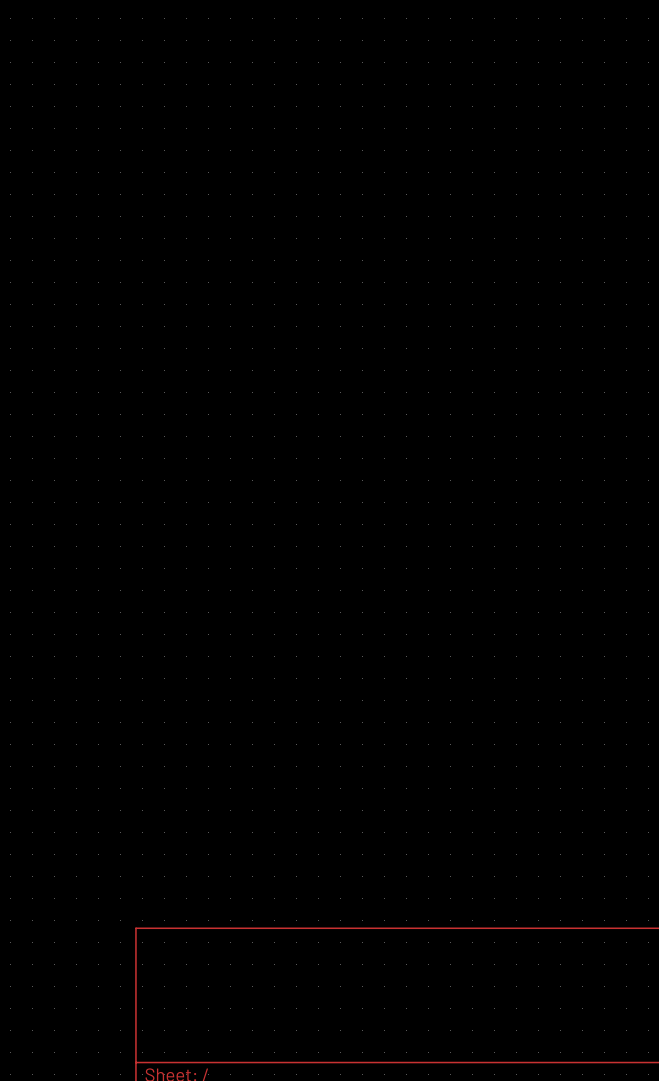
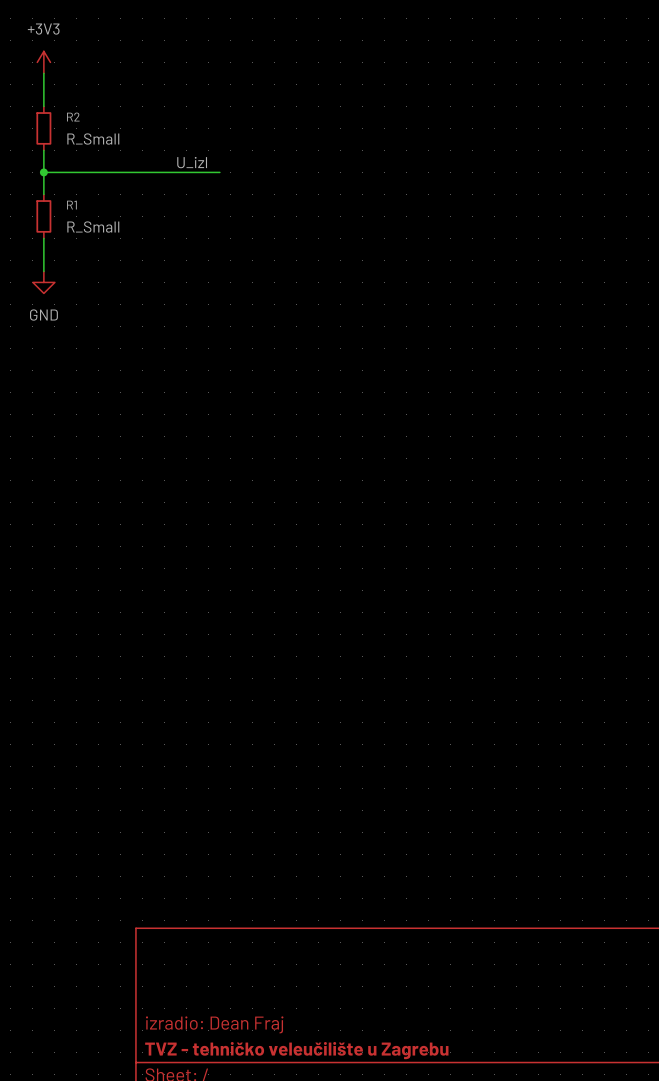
power symbol: none -> +3V3 (43, 62)
wire: none -> (43, 73) (43, 106)
R2: none -> R_Small (43, 128)
wire: none -> (43, 150) (43, 194)
label: none -> U_izl (192, 162)
wire: none -> (43, 172) (219, 172)
junction: none -> (43, 172)
R1: none -> R_Small (43, 216)
wire: none -> (43, 238) (43, 271)
power symbol: none -> GND (43, 282)
title block: none -> izradio: Dean Fraj (214, 1024)
title block: none -> TVZ - tehničko veleučilište u Zagrebu (296, 1050)

